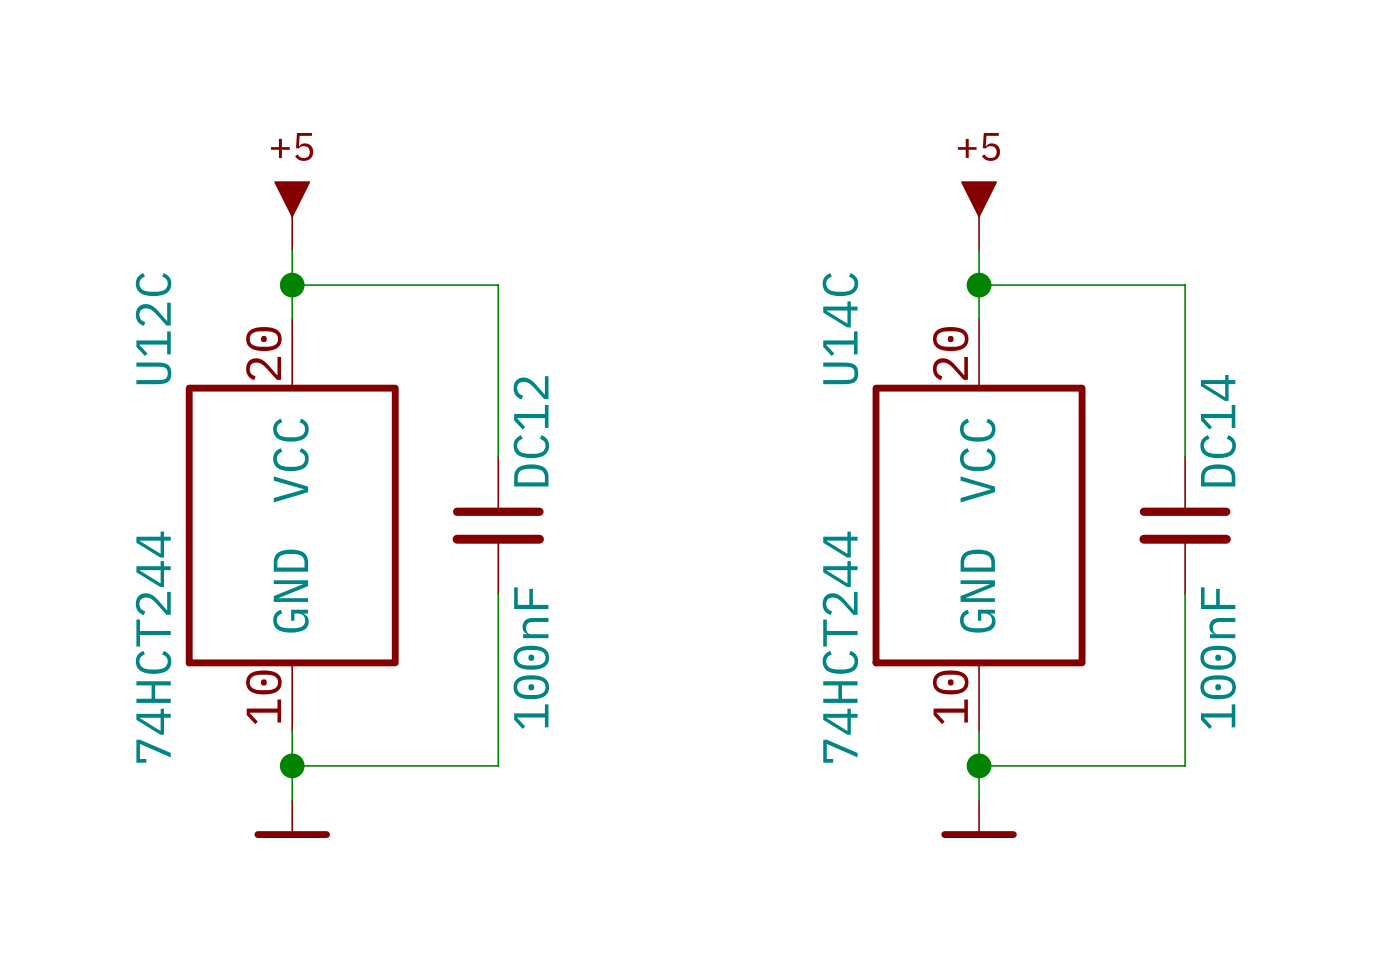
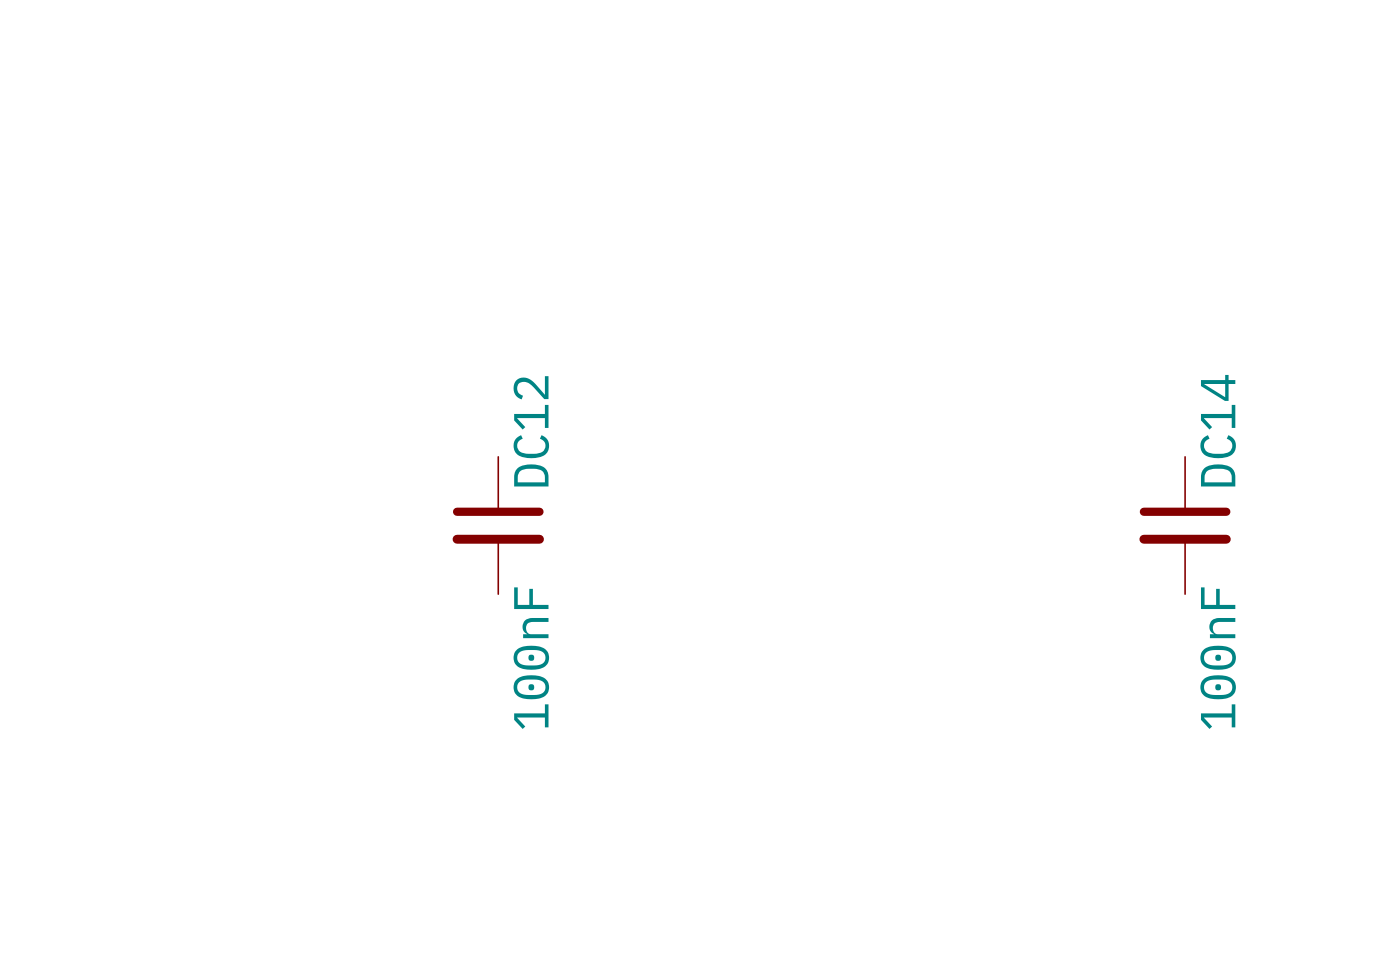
power symbol: (292, 216) -> none
power symbol: (979, 216) -> none
wire: (292, 250) (292, 319) -> none
wire: (979, 250) (979, 319) -> none
wire: (292, 285) (498, 285) (498, 456) -> none
junction: (292, 285) -> none
wire: (979, 285) (1185, 285) (1185, 456) -> none
junction: (979, 285) -> none
U12C: 74HCT244 (292, 525) -> none
U14C: 74HCT244 (979, 525) -> none
wire: (498, 594) (498, 765) (292, 765) -> none
wire: (1185, 594) (1185, 765) (979, 765) -> none
wire: (292, 731) (292, 800) -> none
wire: (979, 731) (979, 800) -> none
junction: (292, 765) -> none
junction: (979, 765) -> none
power symbol: (292, 819) -> none
power symbol: (979, 819) -> none

